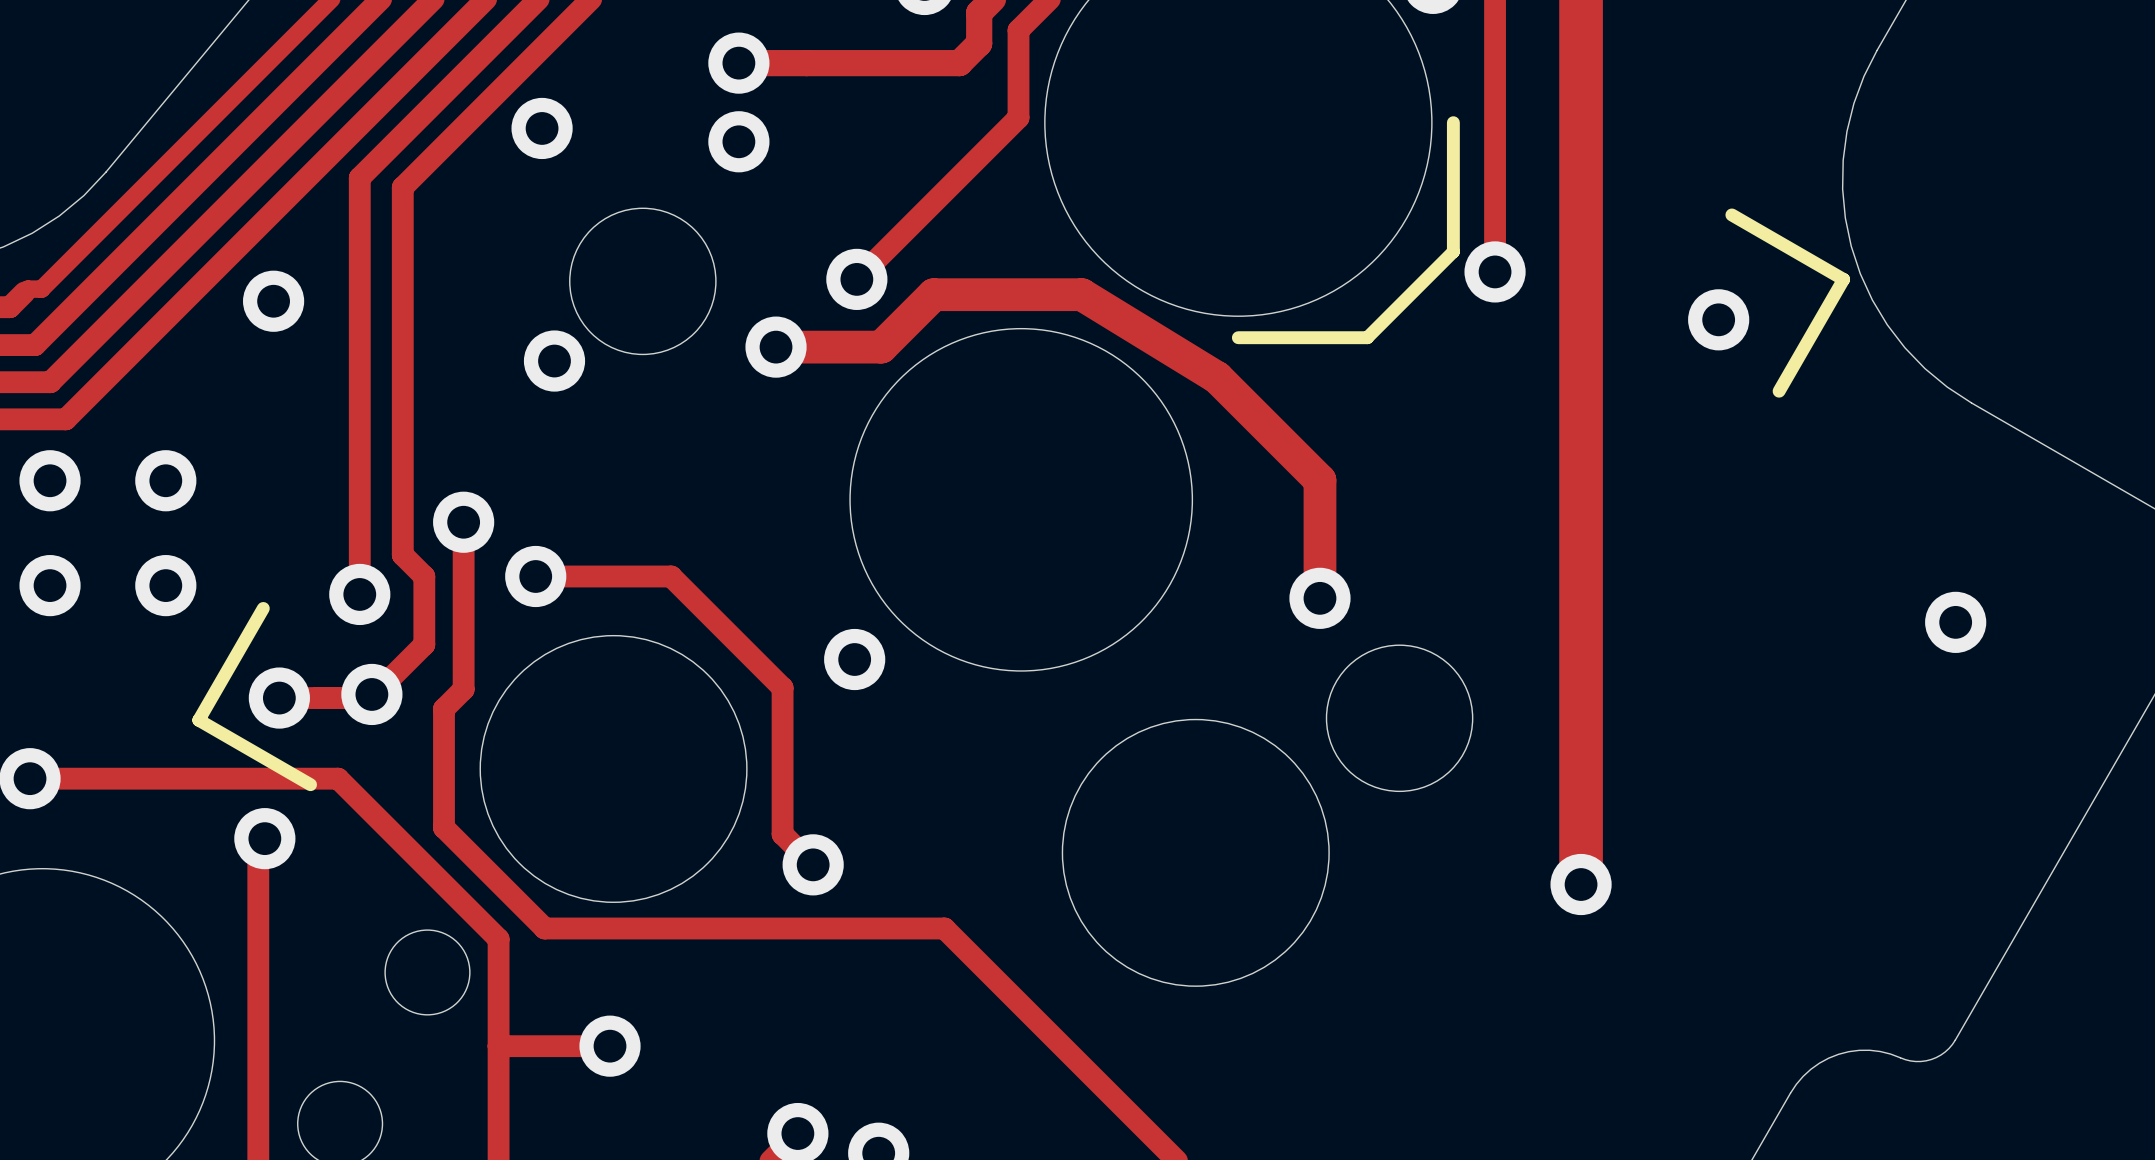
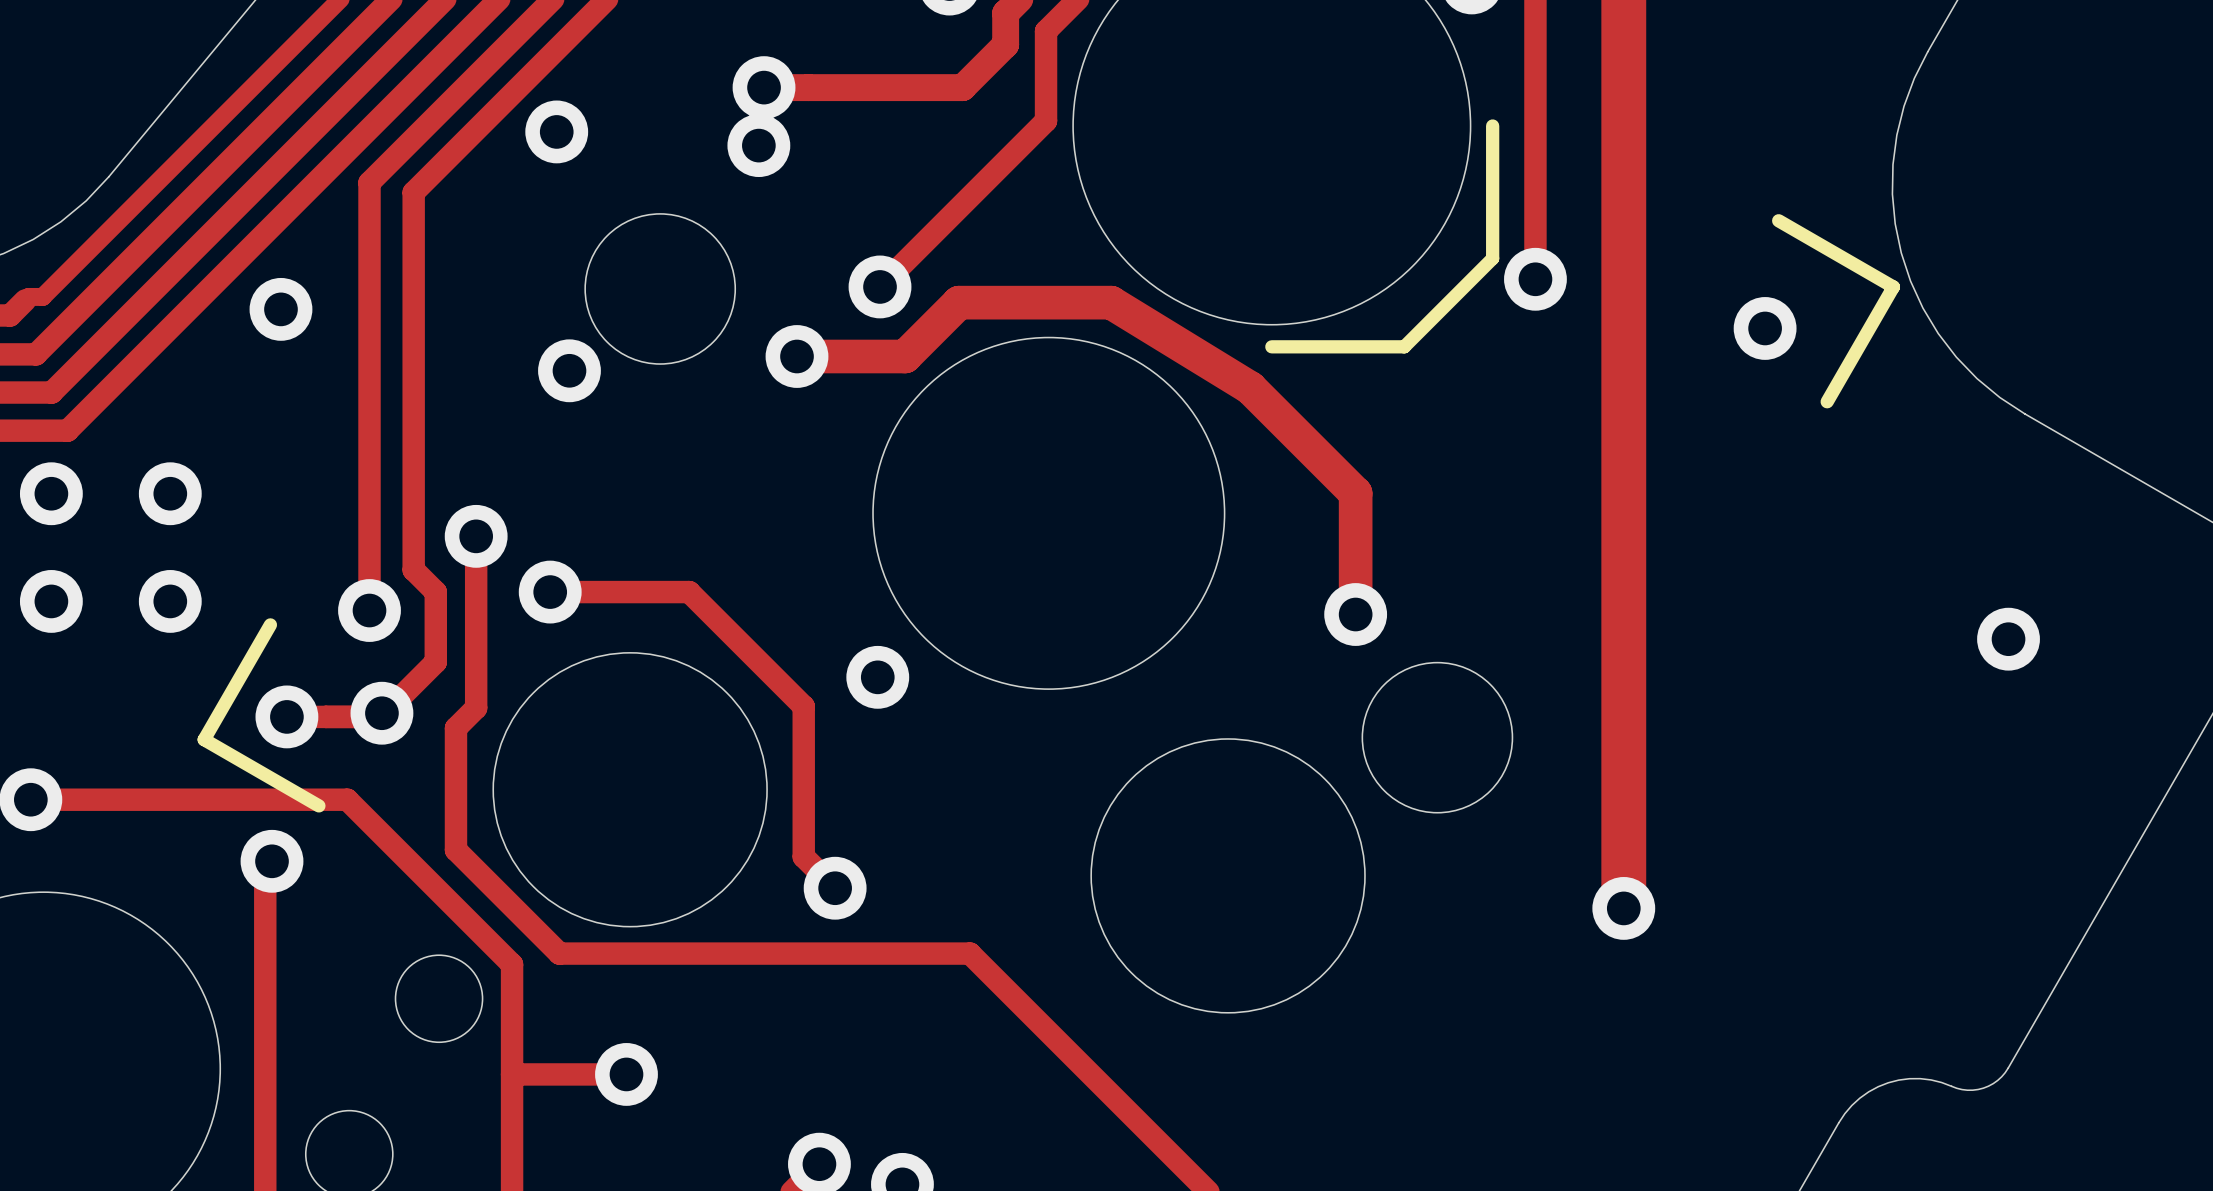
track: (738, 63) (959, 63) -> (764, 87) (962, 87) (985, 64)
via position: (738, 63) -> (764, 87)

